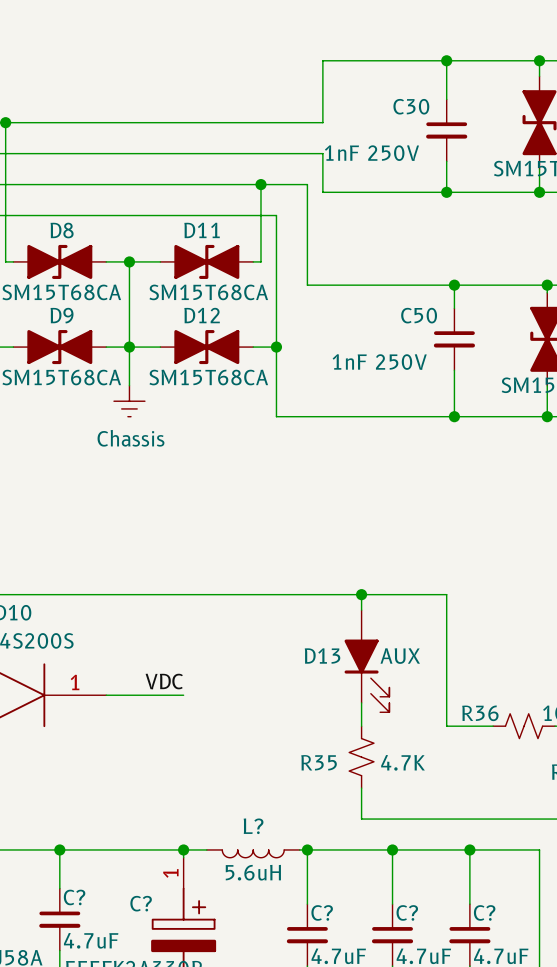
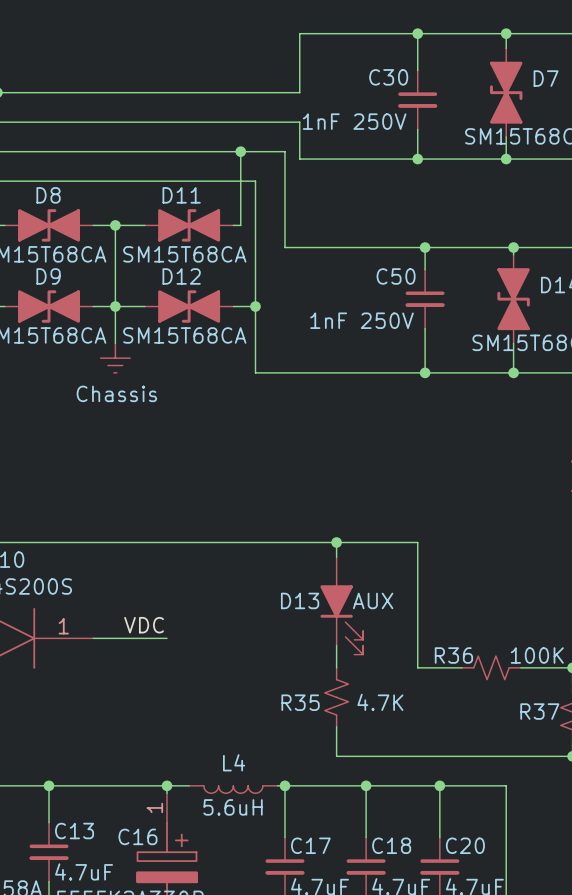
L? name: L? (253, 826) -> L4 (234, 762)
C? name: C? (74, 897) -> C13 (74, 831)
C? name: C? (141, 903) -> C16 (137, 836)
C? name: C? (322, 912) -> C17 (310, 845)
C? name: C? (407, 912) -> C18 (391, 845)
C? name: C? (484, 912) -> C20 (465, 845)

